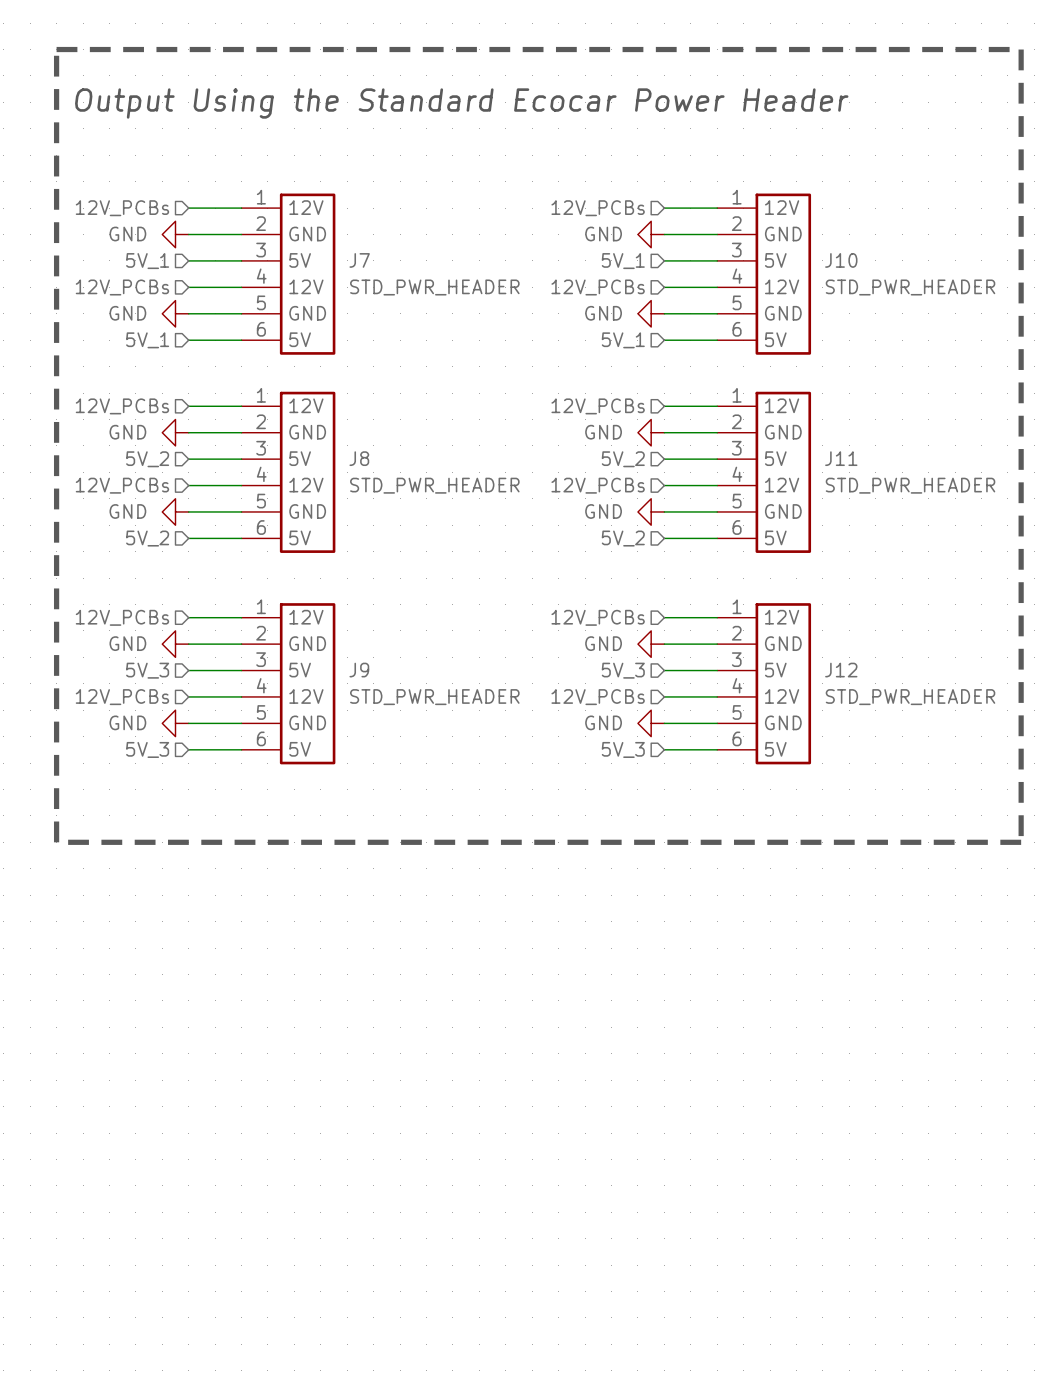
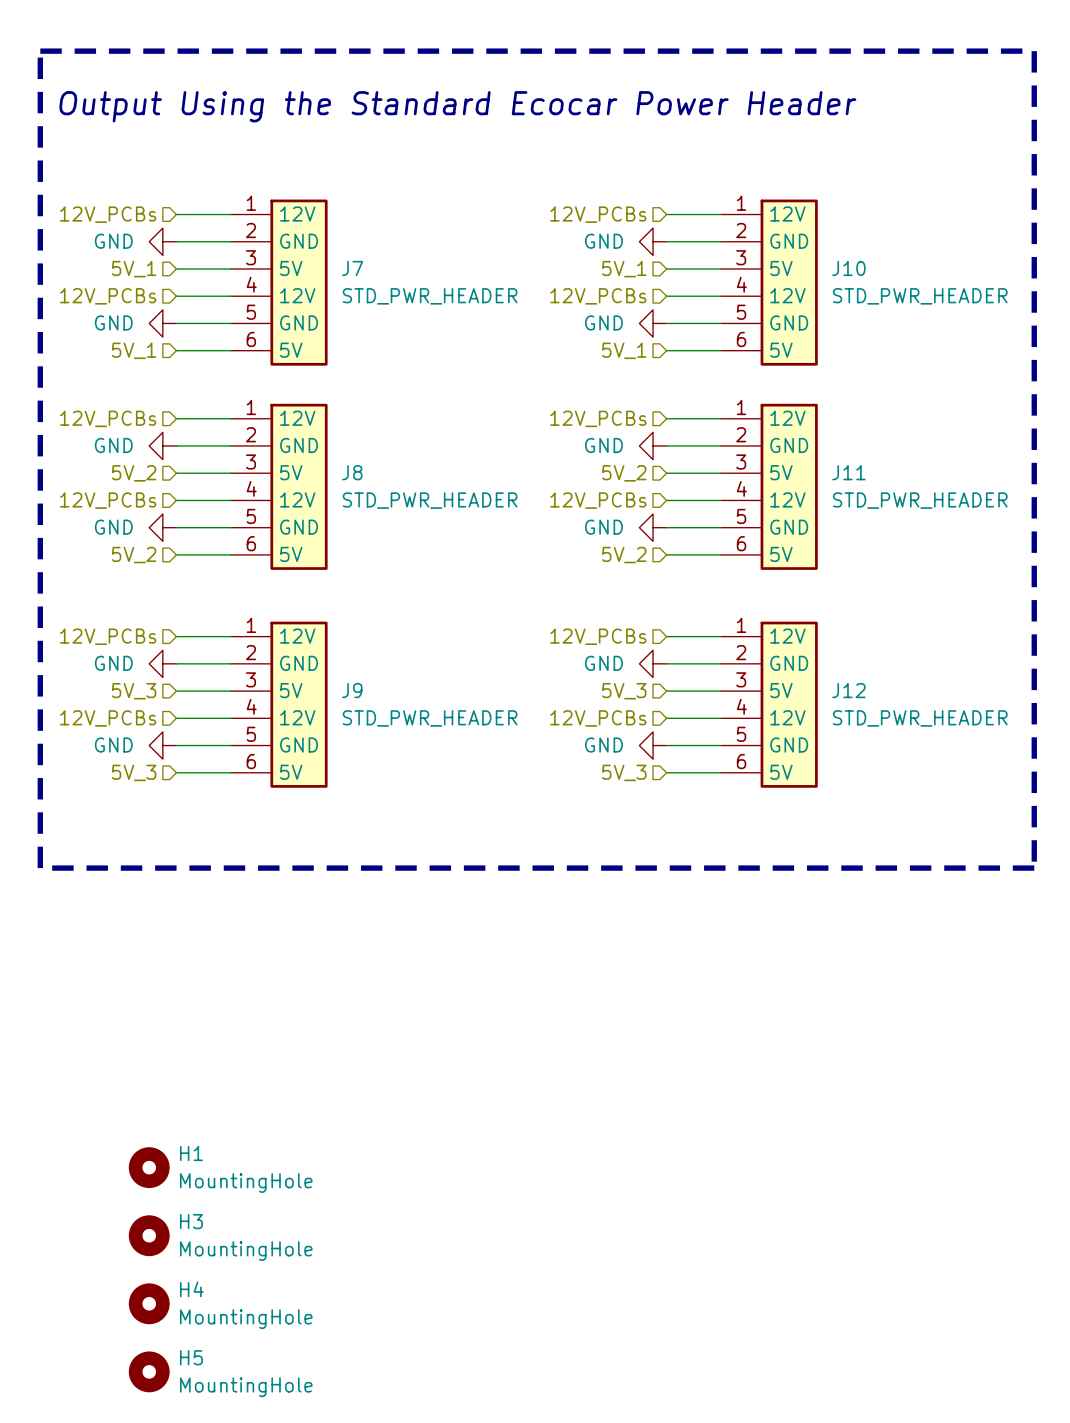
H1: none -> MountingHole (149, 1167)
H3: none -> MountingHole (149, 1235)
H4: none -> MountingHole (149, 1303)
H5: none -> MountingHole (149, 1371)

